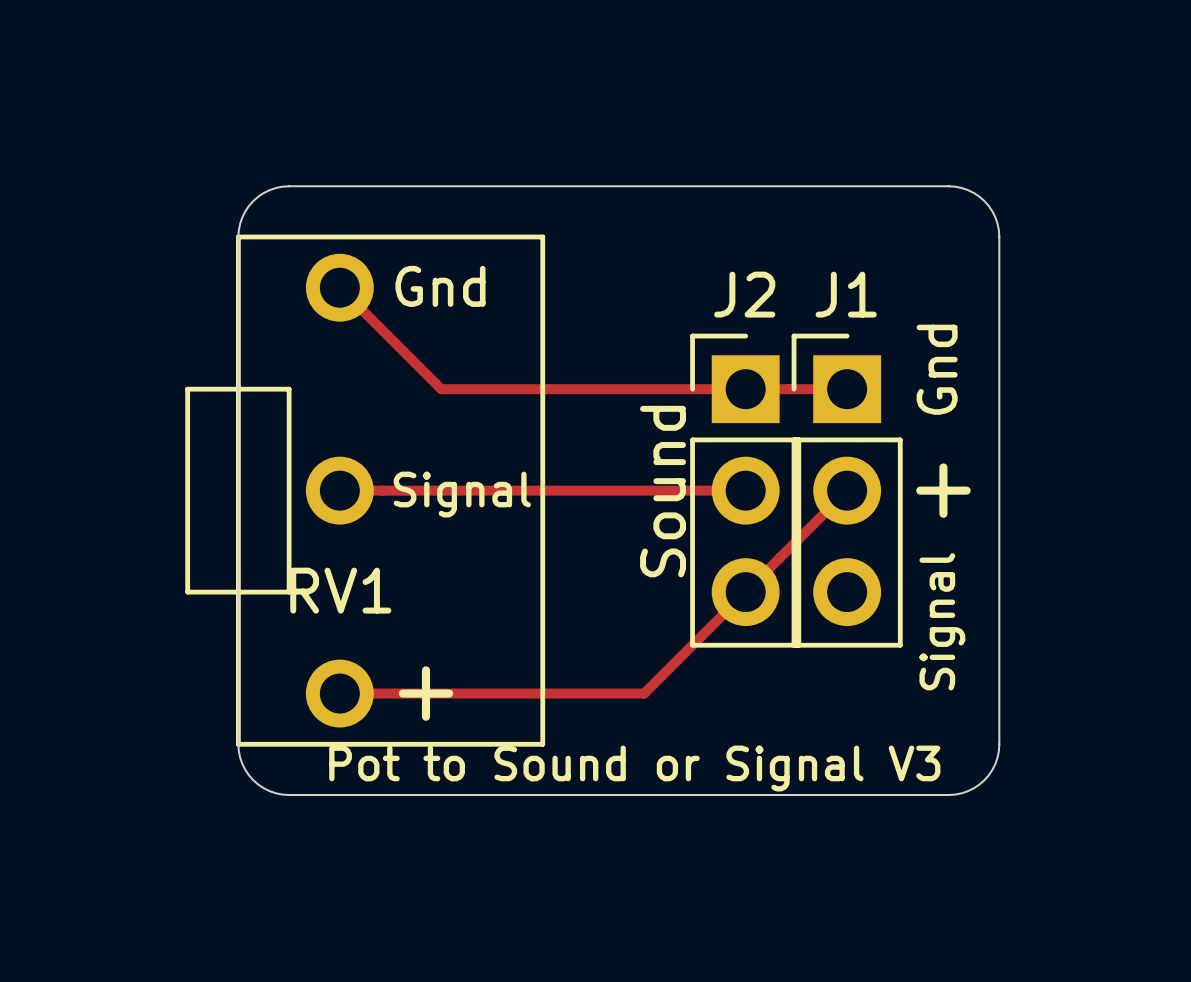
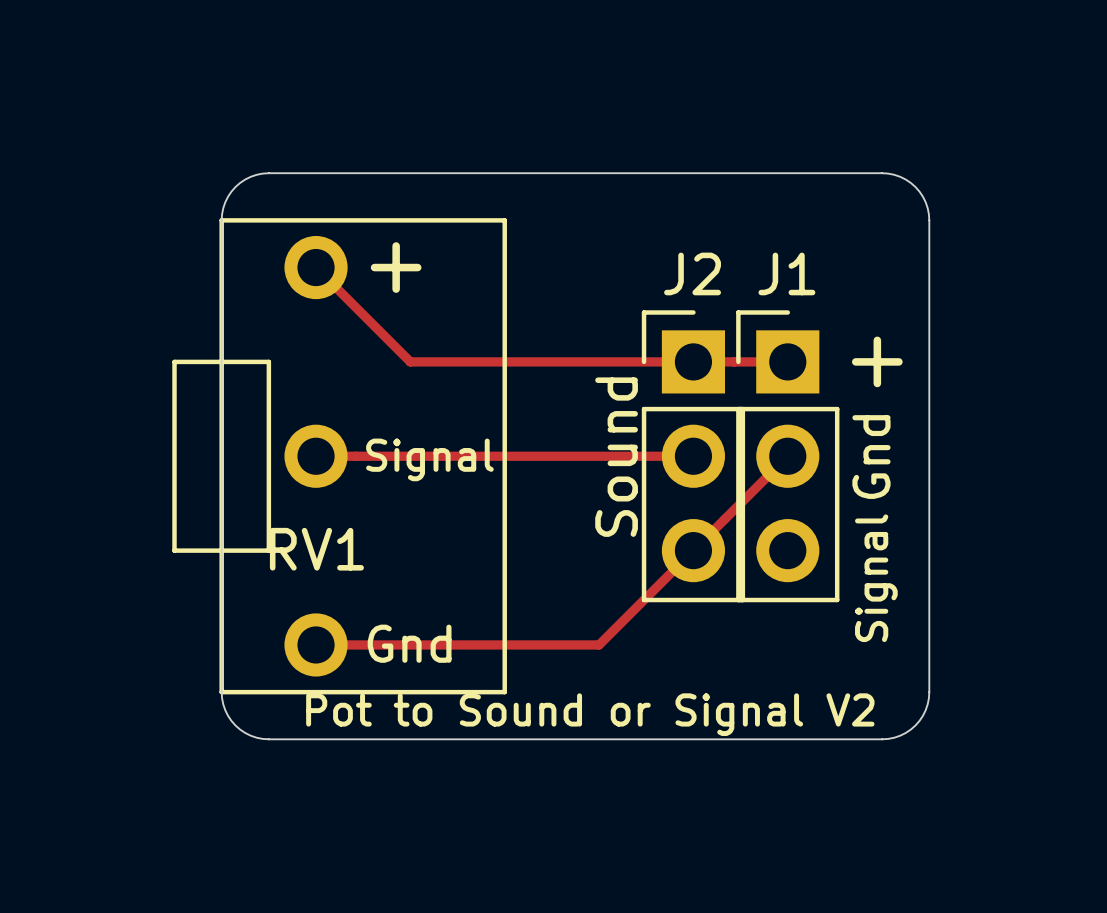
text: Gnd (440, 286) -> + (396, 267)
text: Gnd (937, 369) -> + (877, 361)
text: + (943, 490) -> Gnd (871, 457)
text: + (425, 693) -> Gnd (409, 643)
text: Pot to Sound or Signal V3 (634, 768) -> Pot to Sound or Signal V2 (590, 714)

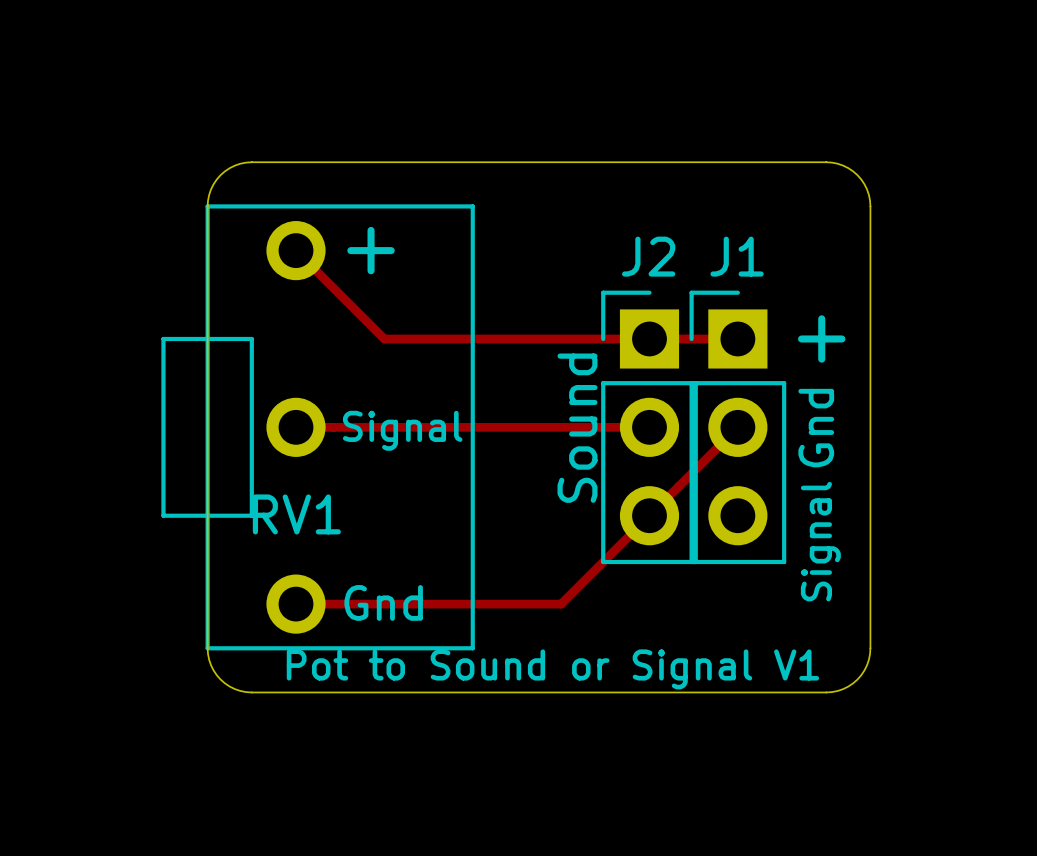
text: Pot to Sound or Signal V2 (590, 714) -> Pot to Sound or Signal V1 (552, 669)

